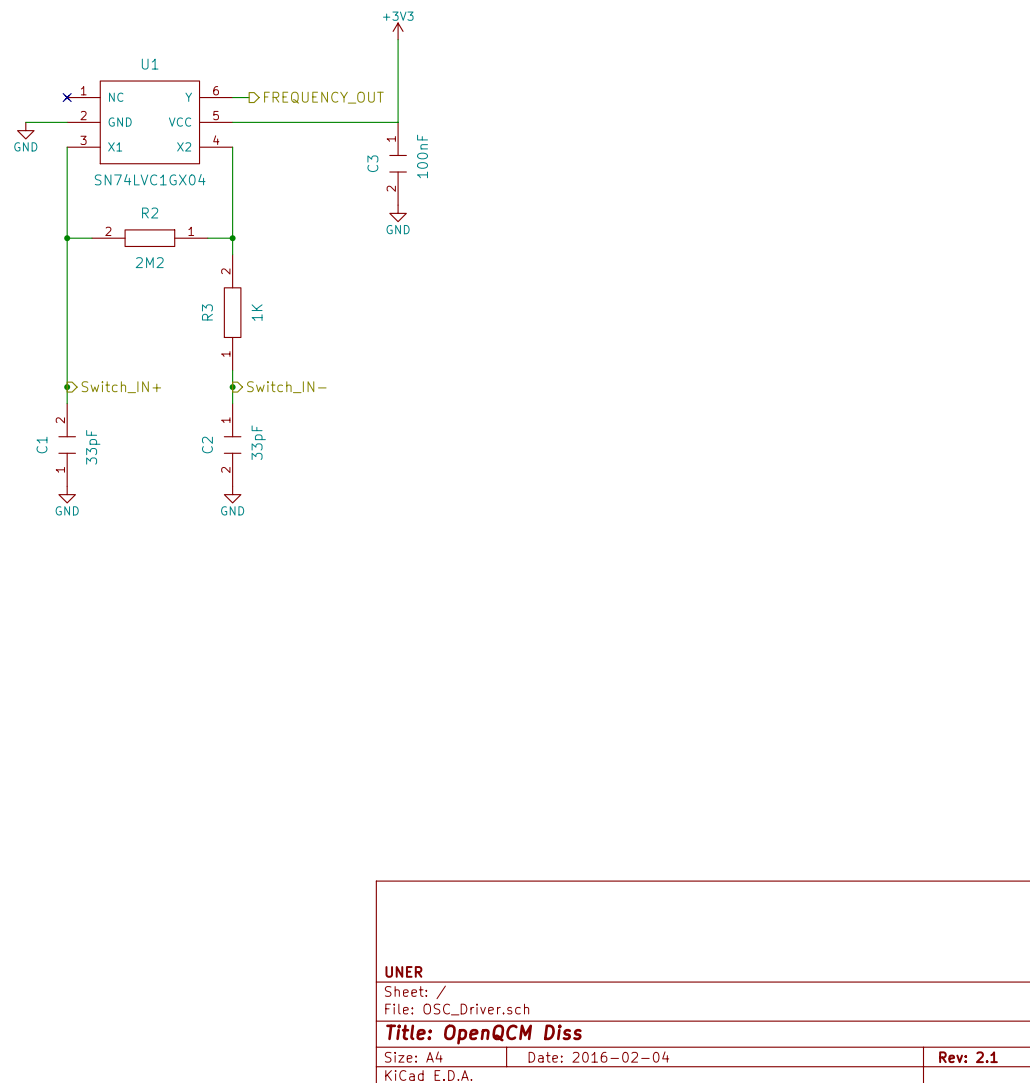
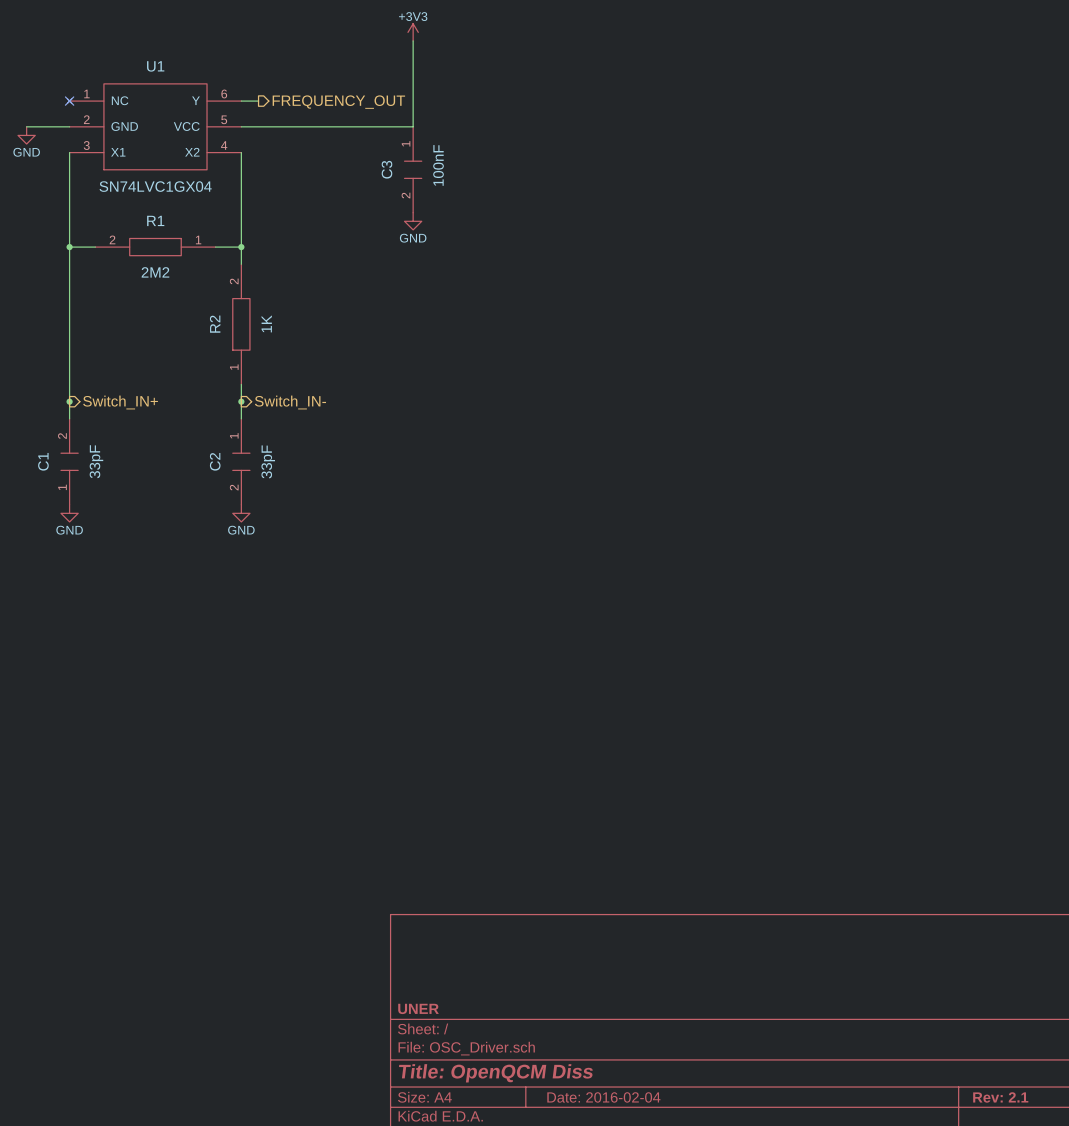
R2 name: R2 (150, 213) -> R1 (155, 220)
R3 name: R3 (207, 312) -> R2 (215, 324)

